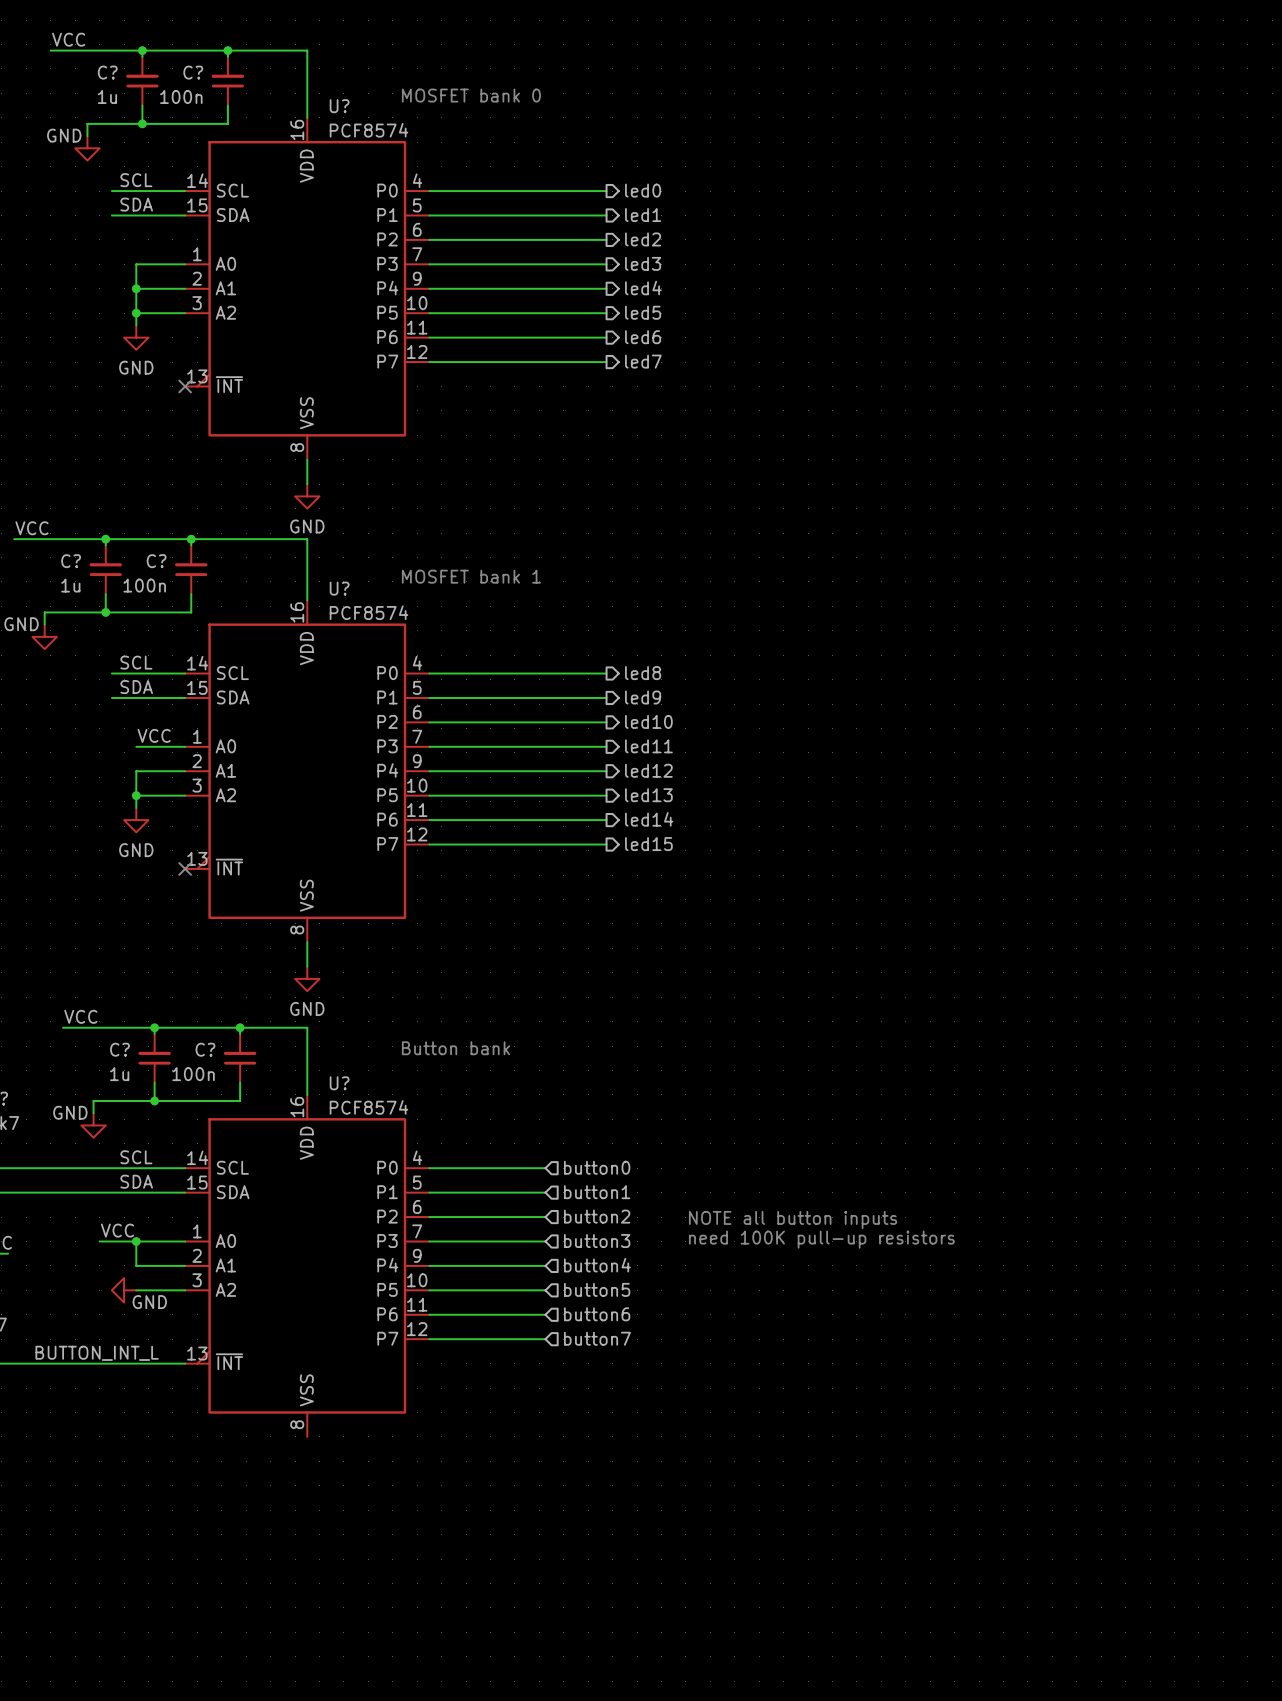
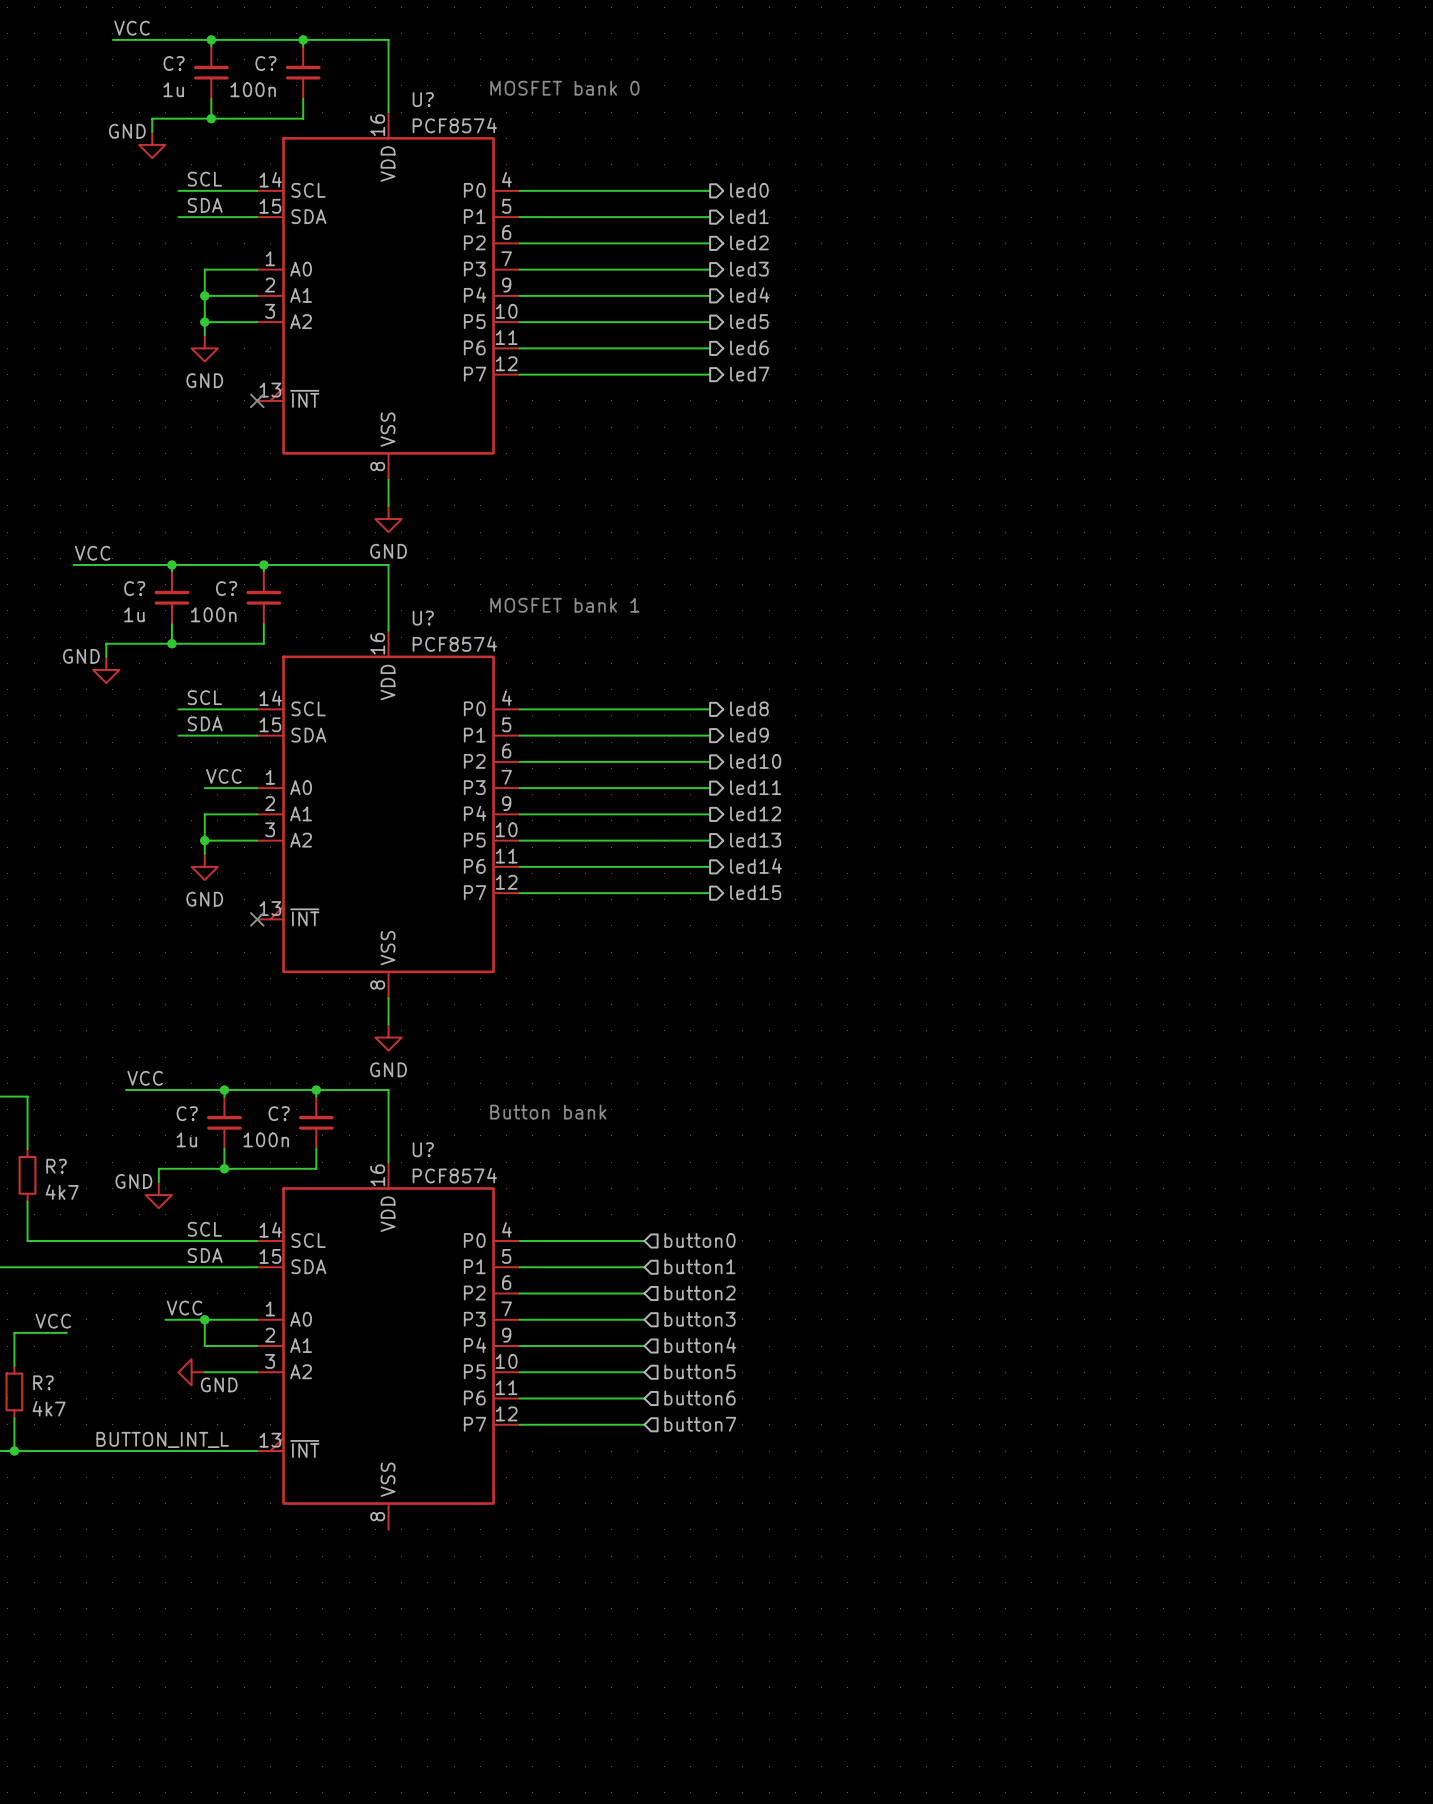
text: NOTE all button inputs (793, 1219) -> none
text: need 100K pull-up resistors (821, 1239) -> none

